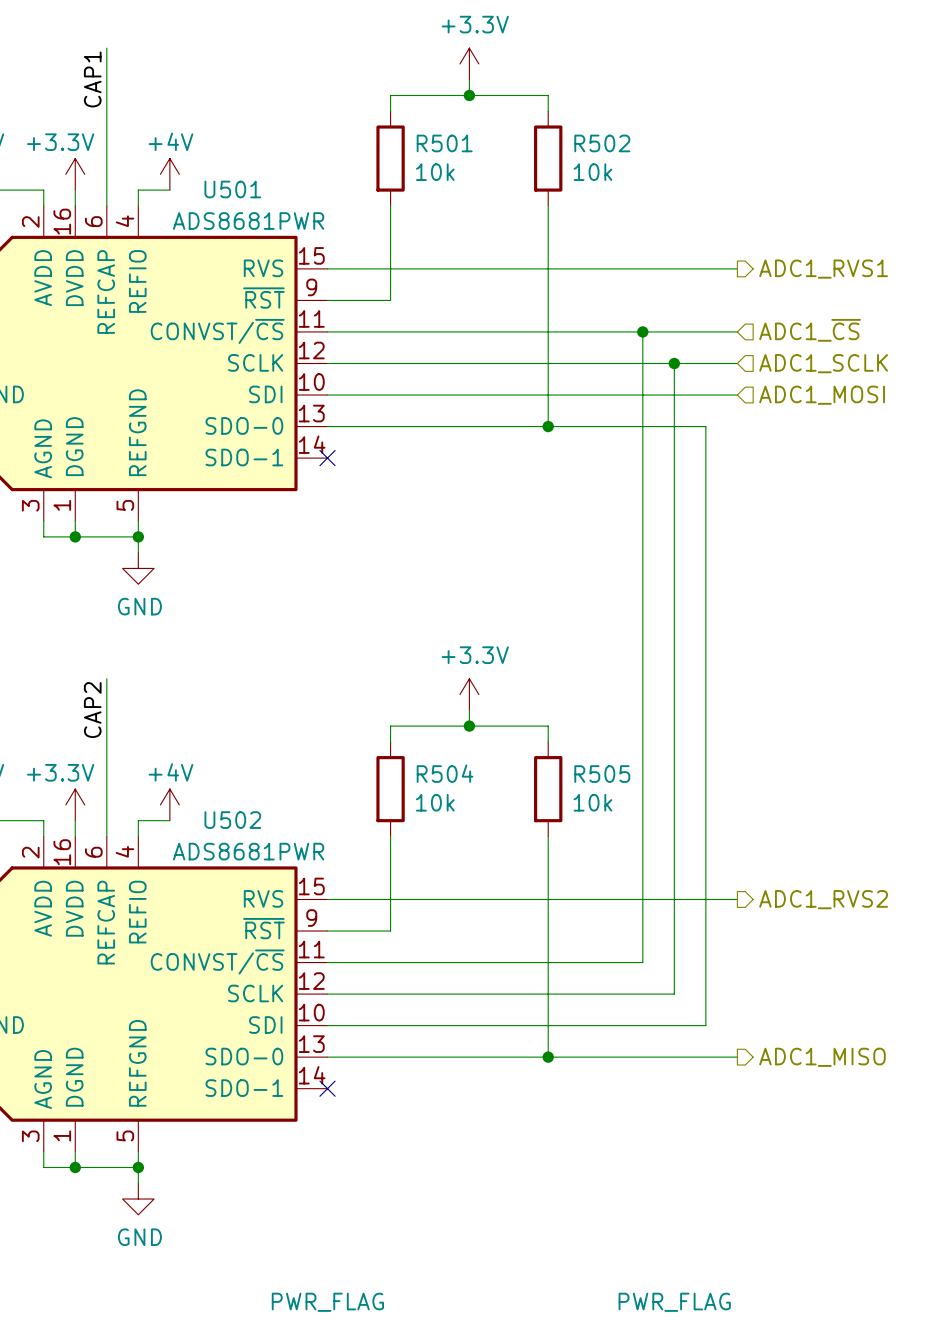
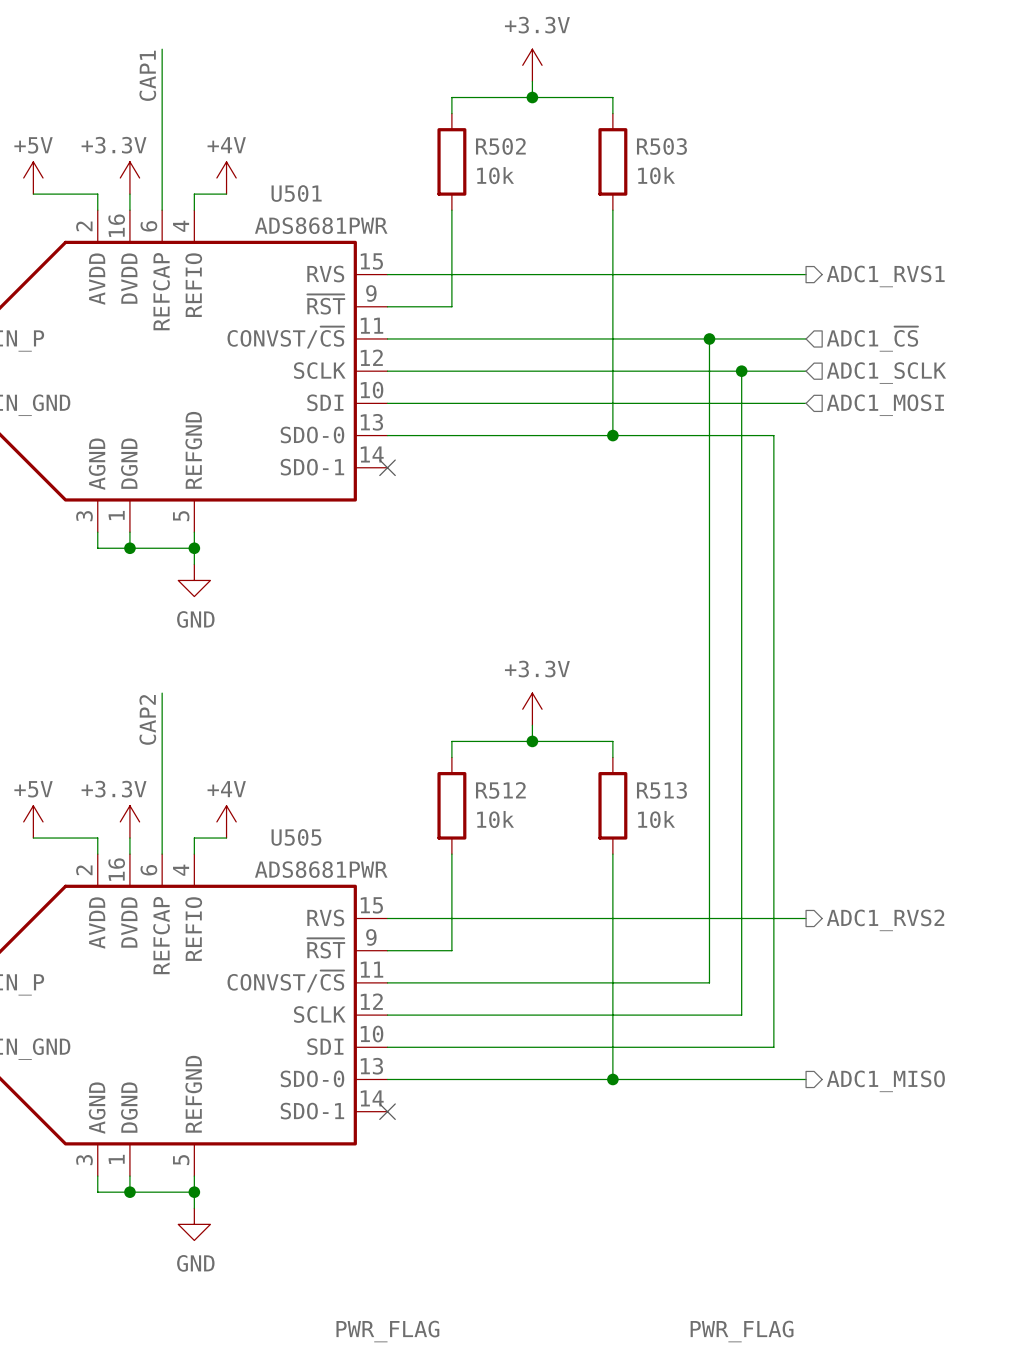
R501 name: R501 (444, 143) -> R502 (500, 146)
R502 name: R502 (602, 143) -> R503 (661, 146)
R504 name: R504 (445, 773) -> R512 (500, 790)
R505 name: R505 (602, 774) -> R513 (661, 790)
U502 name: U502 (232, 820) -> U505 (296, 837)

